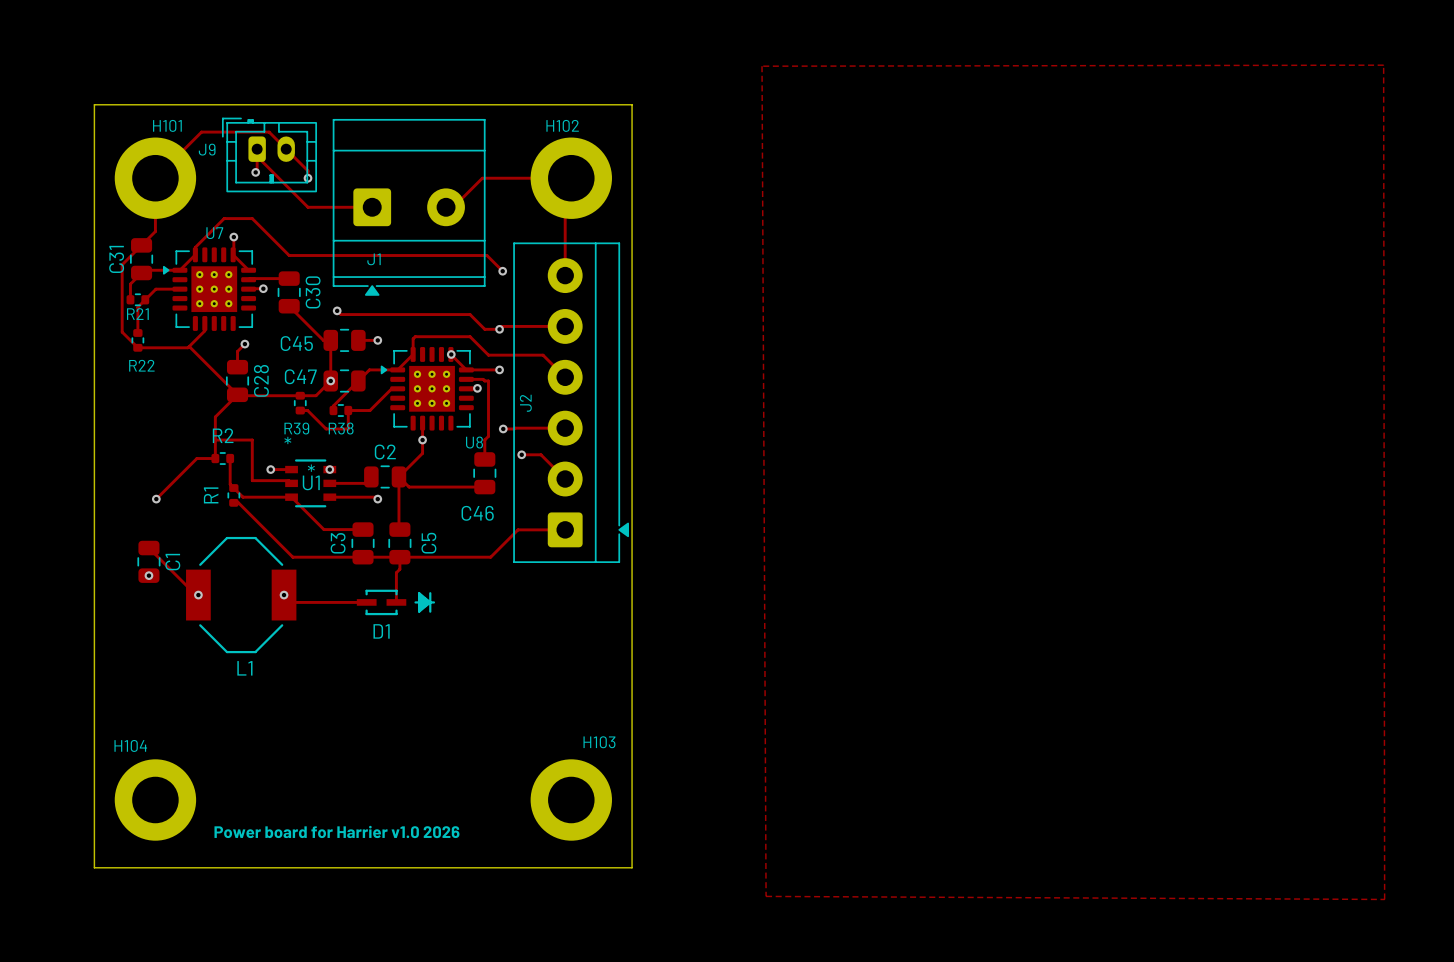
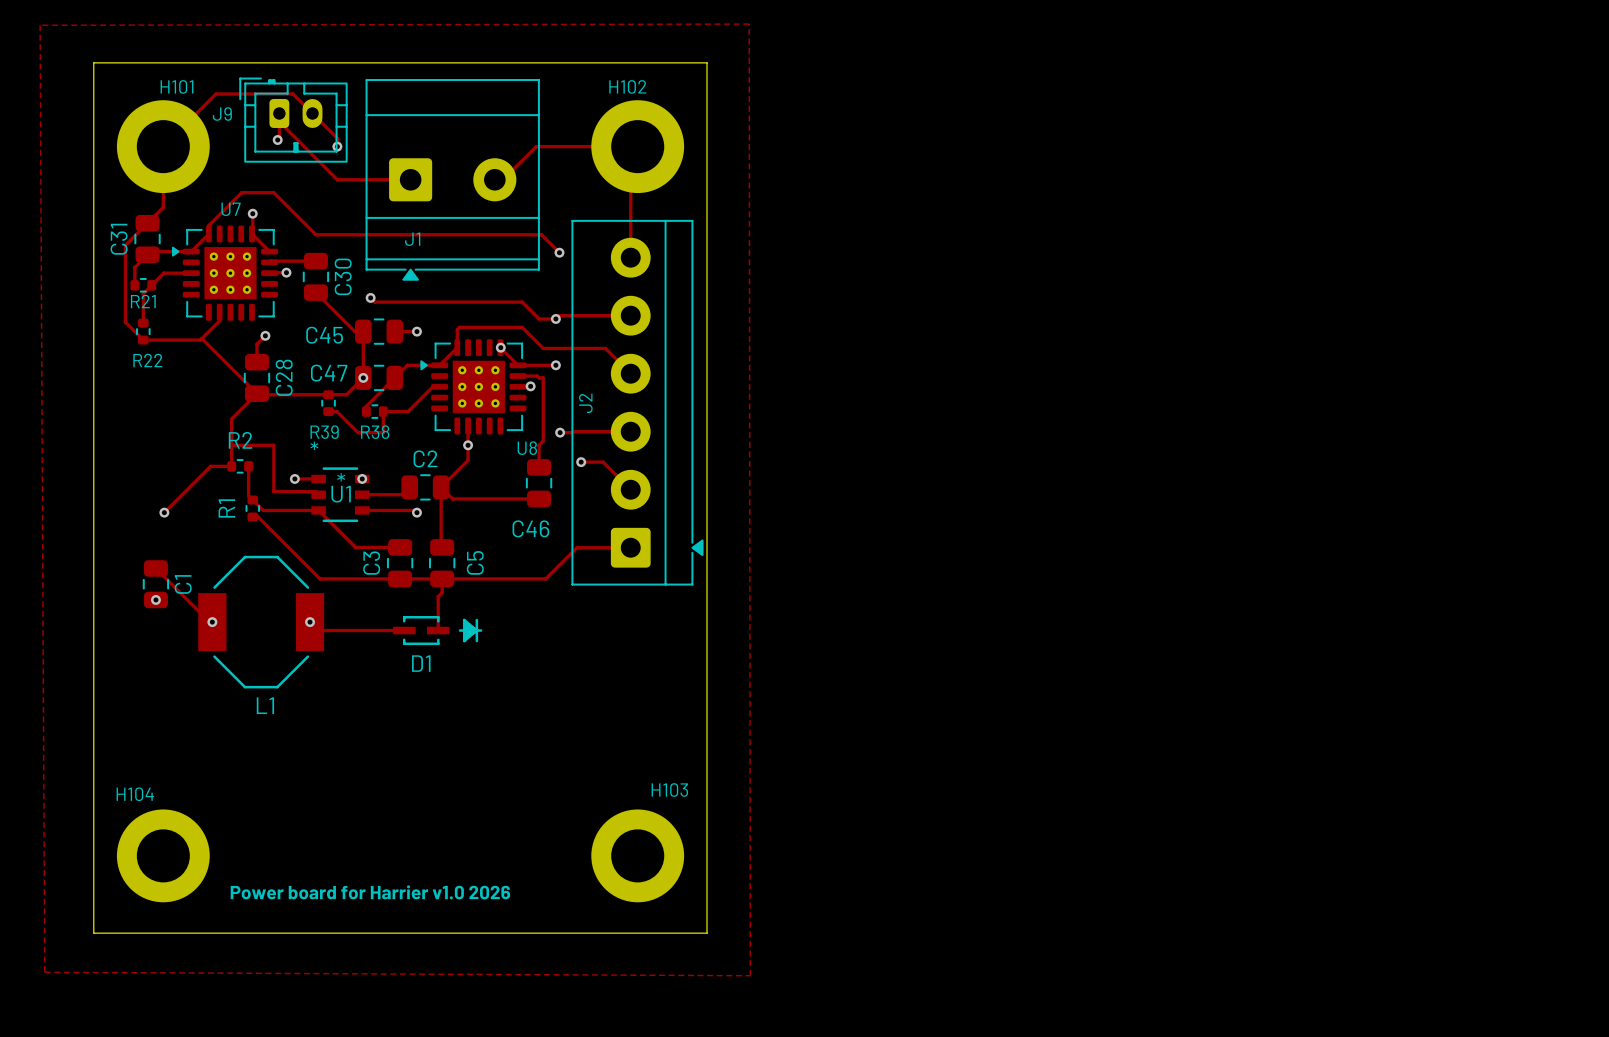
zone outline: (1383, 65) (762, 66) (766, 896) (1384, 899) (1383, 65) -> none
zone outline: none -> (749, 24) (40, 25) (44, 972) (750, 975) (749, 24)

